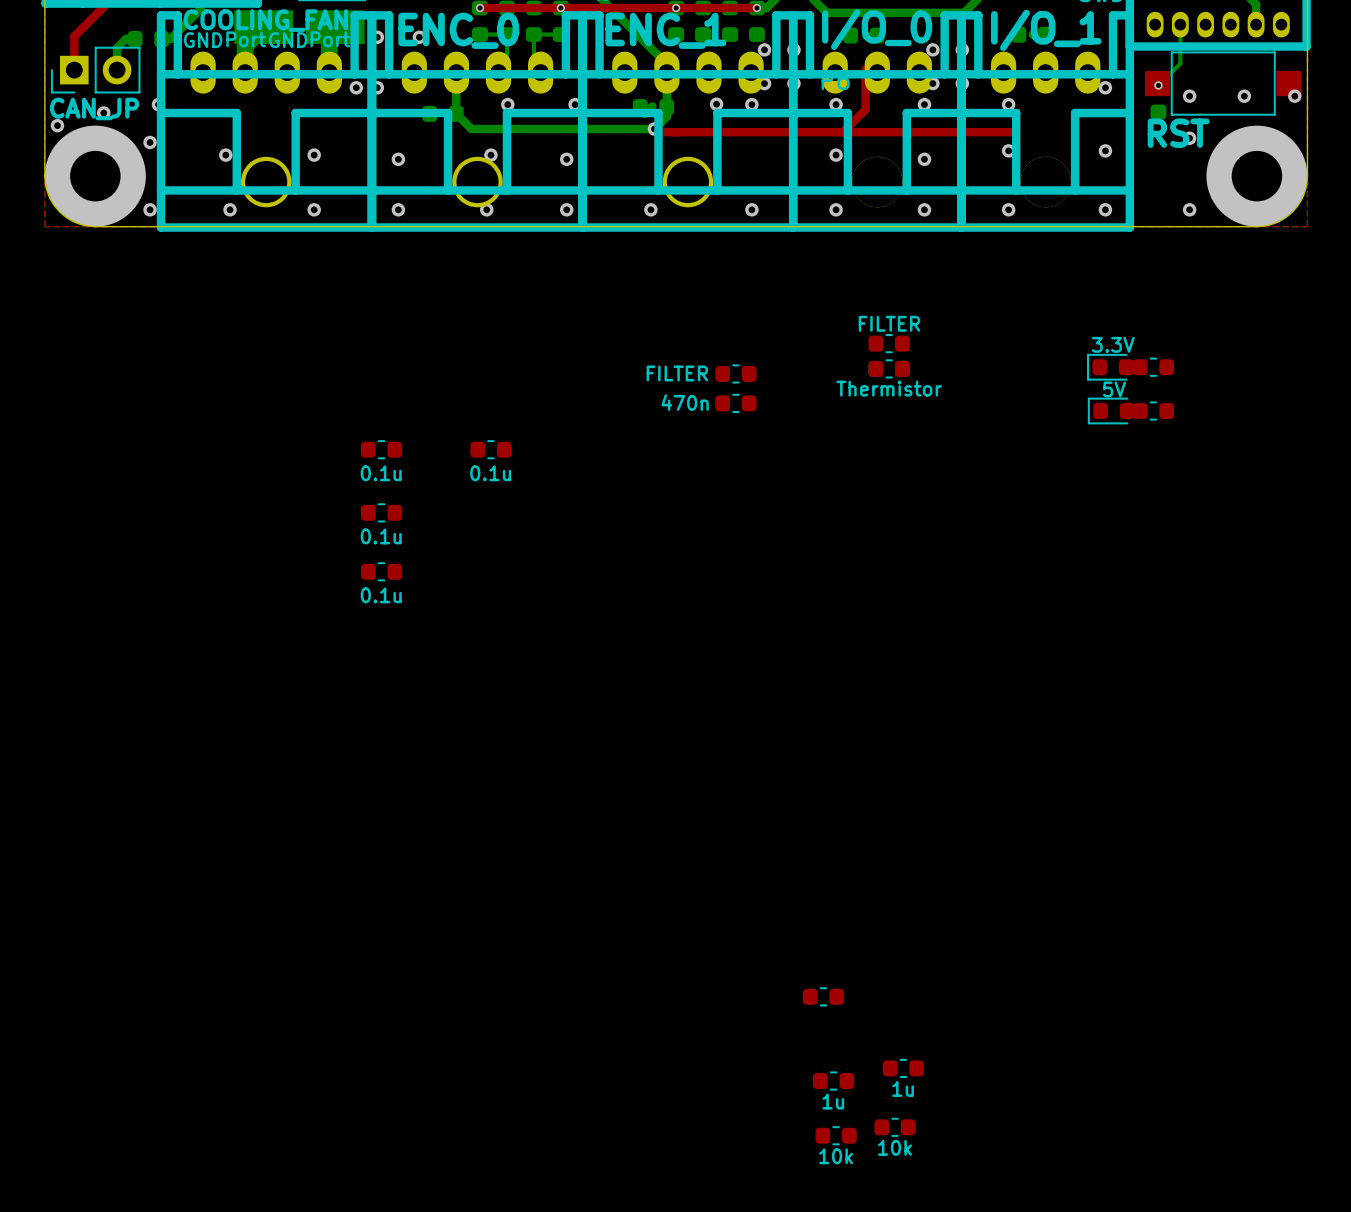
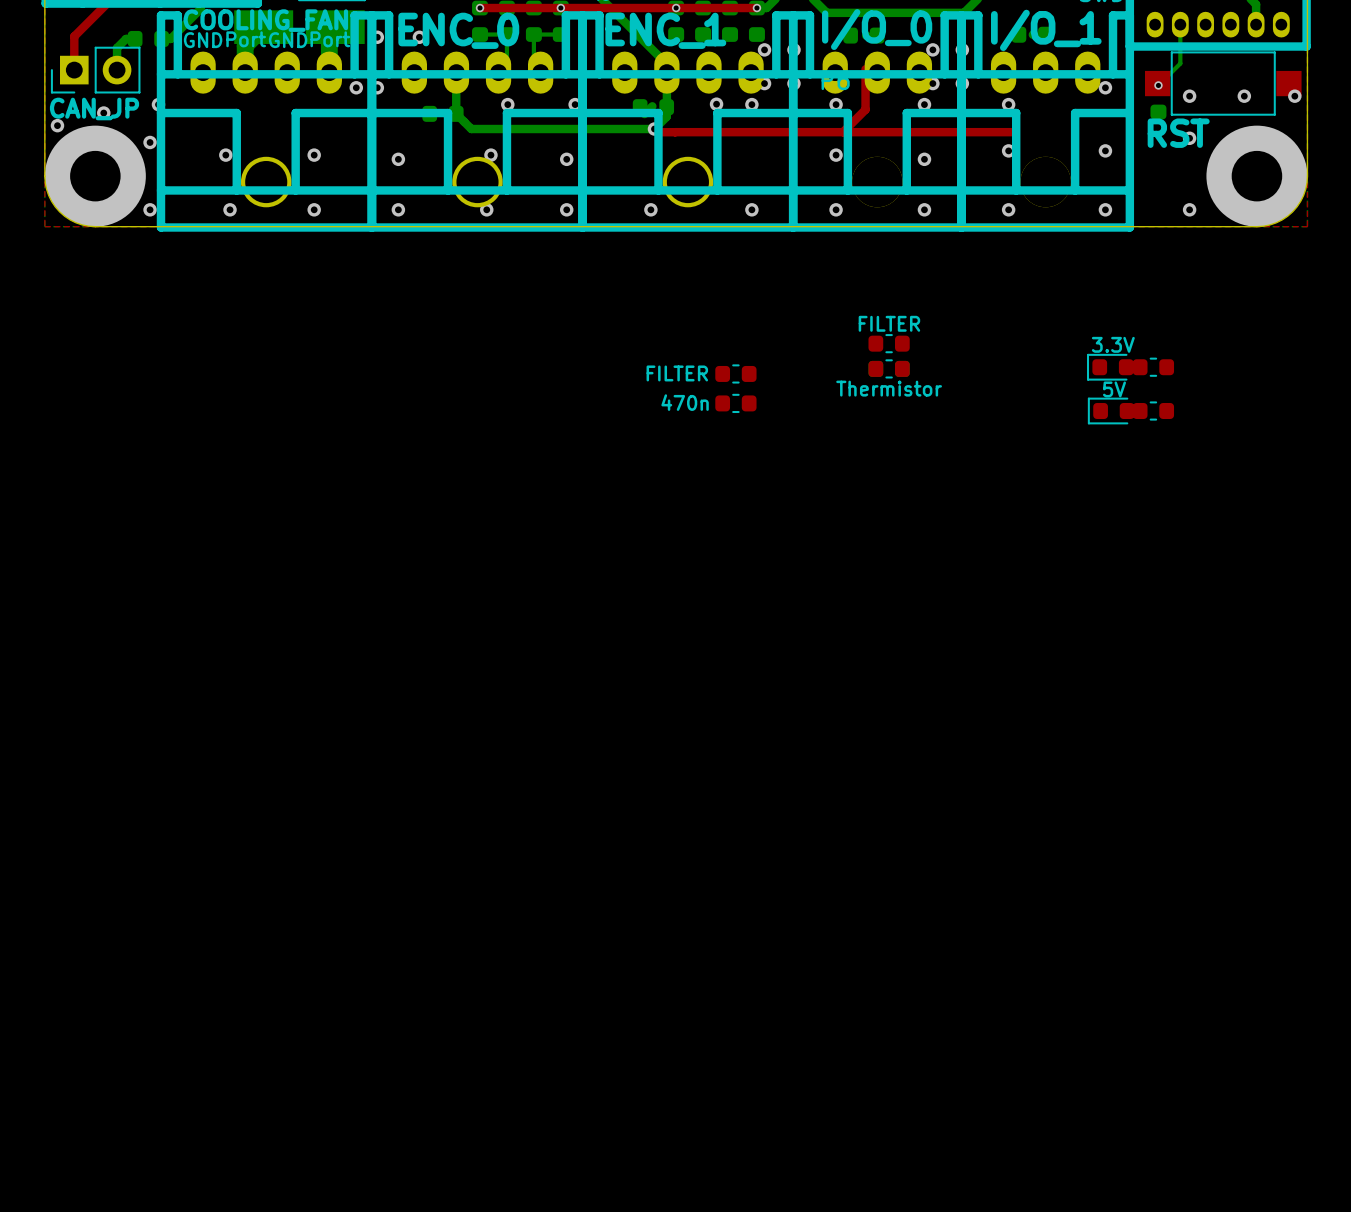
part: 0.1u (381, 449) -> none
part: 0.1u (490, 449) -> none
part: 0.1u (381, 512) -> none
part: 0.1u (381, 571) -> none
part: (823, 996) -> none
part: 1u (903, 1068) -> none
part: 1u (833, 1081) -> none
part: 10k (895, 1127) -> none
part: 10k (836, 1135) -> none

